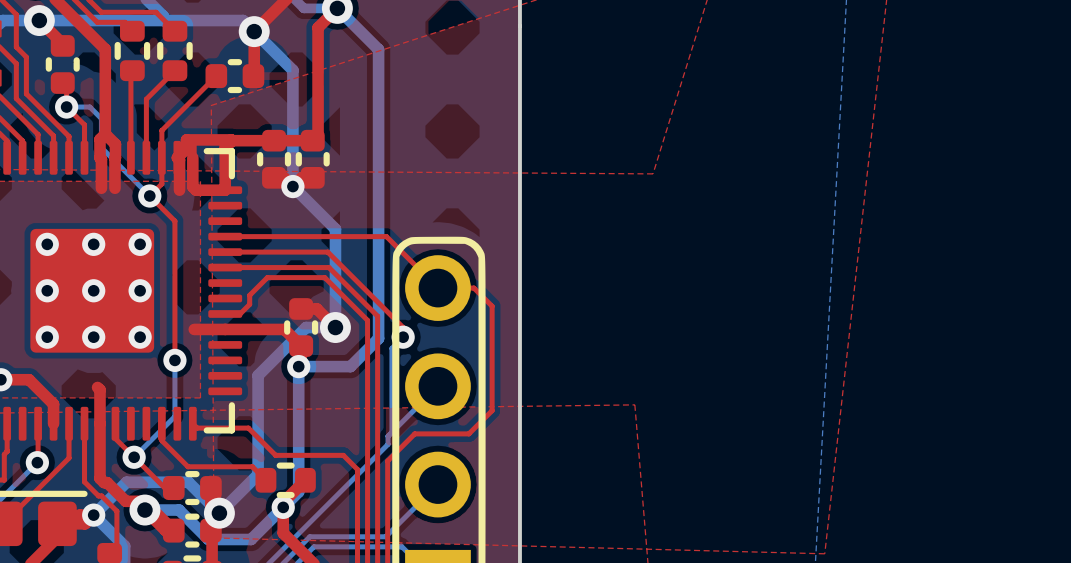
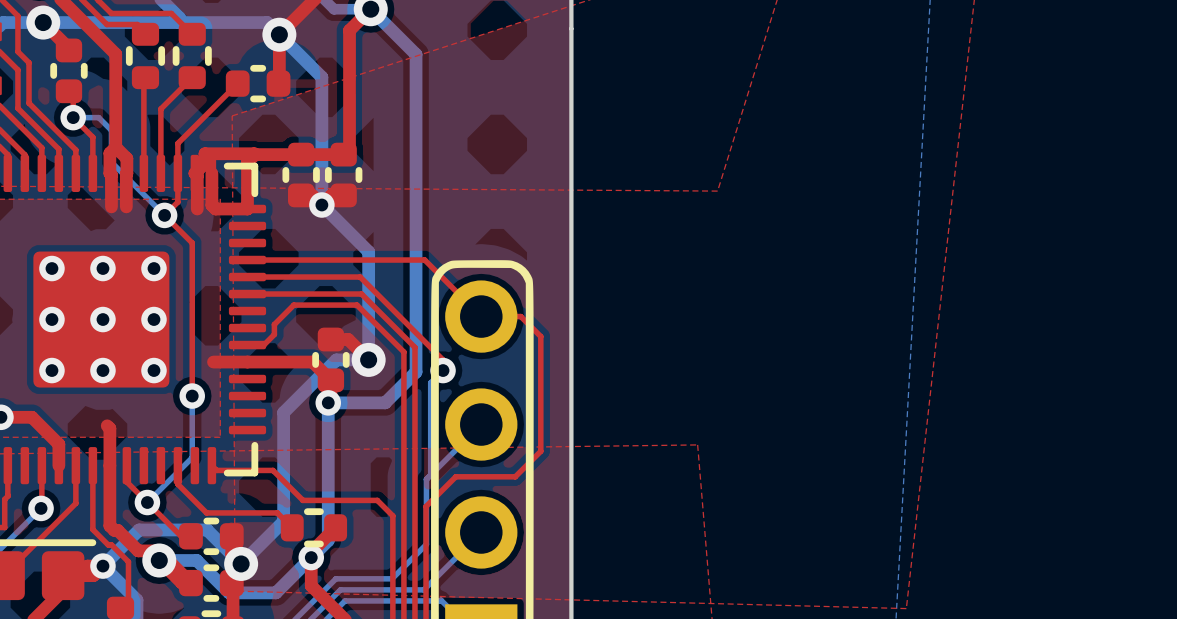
bottom track: (388, 444) (305, 526) -> (426, 488) (426, 544) (392, 578) (335, 578)

